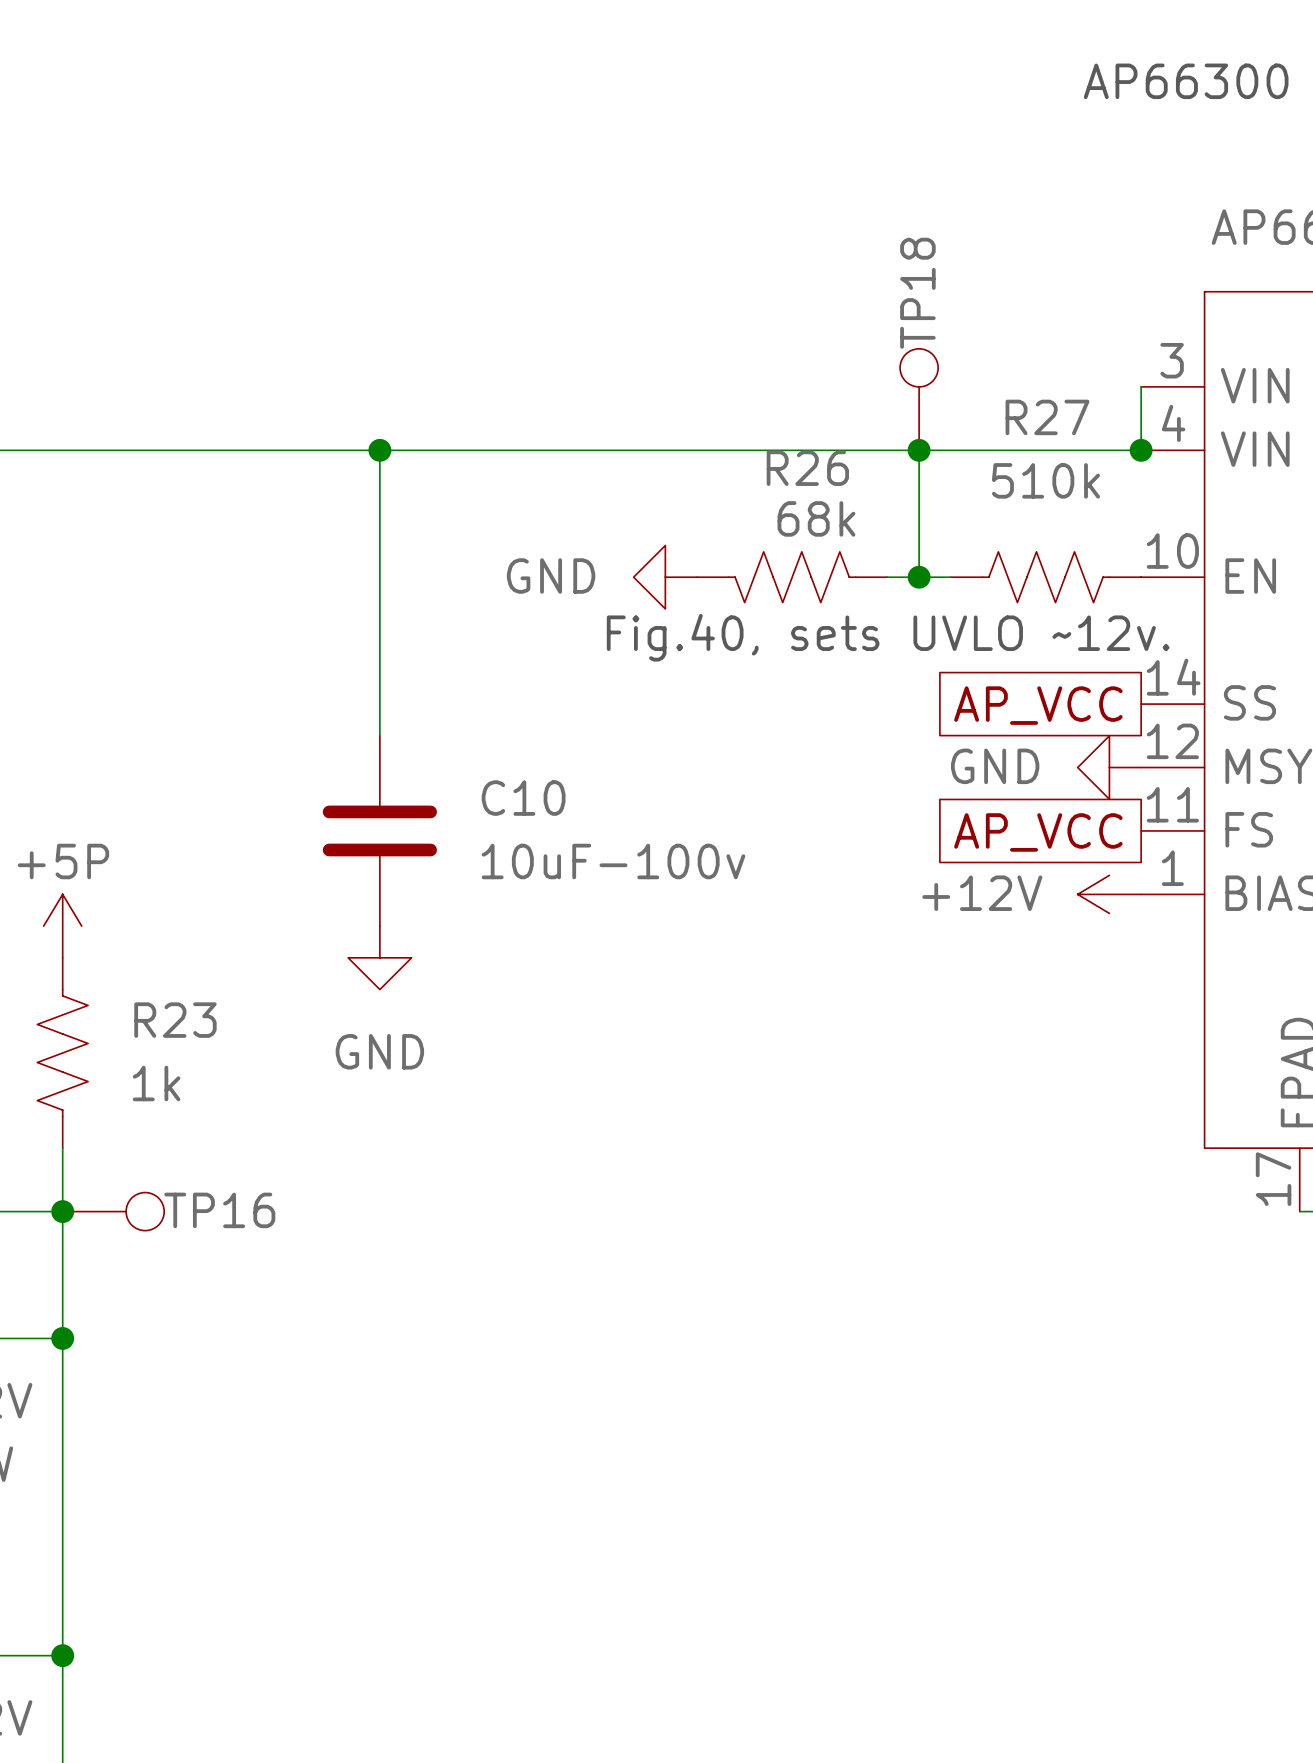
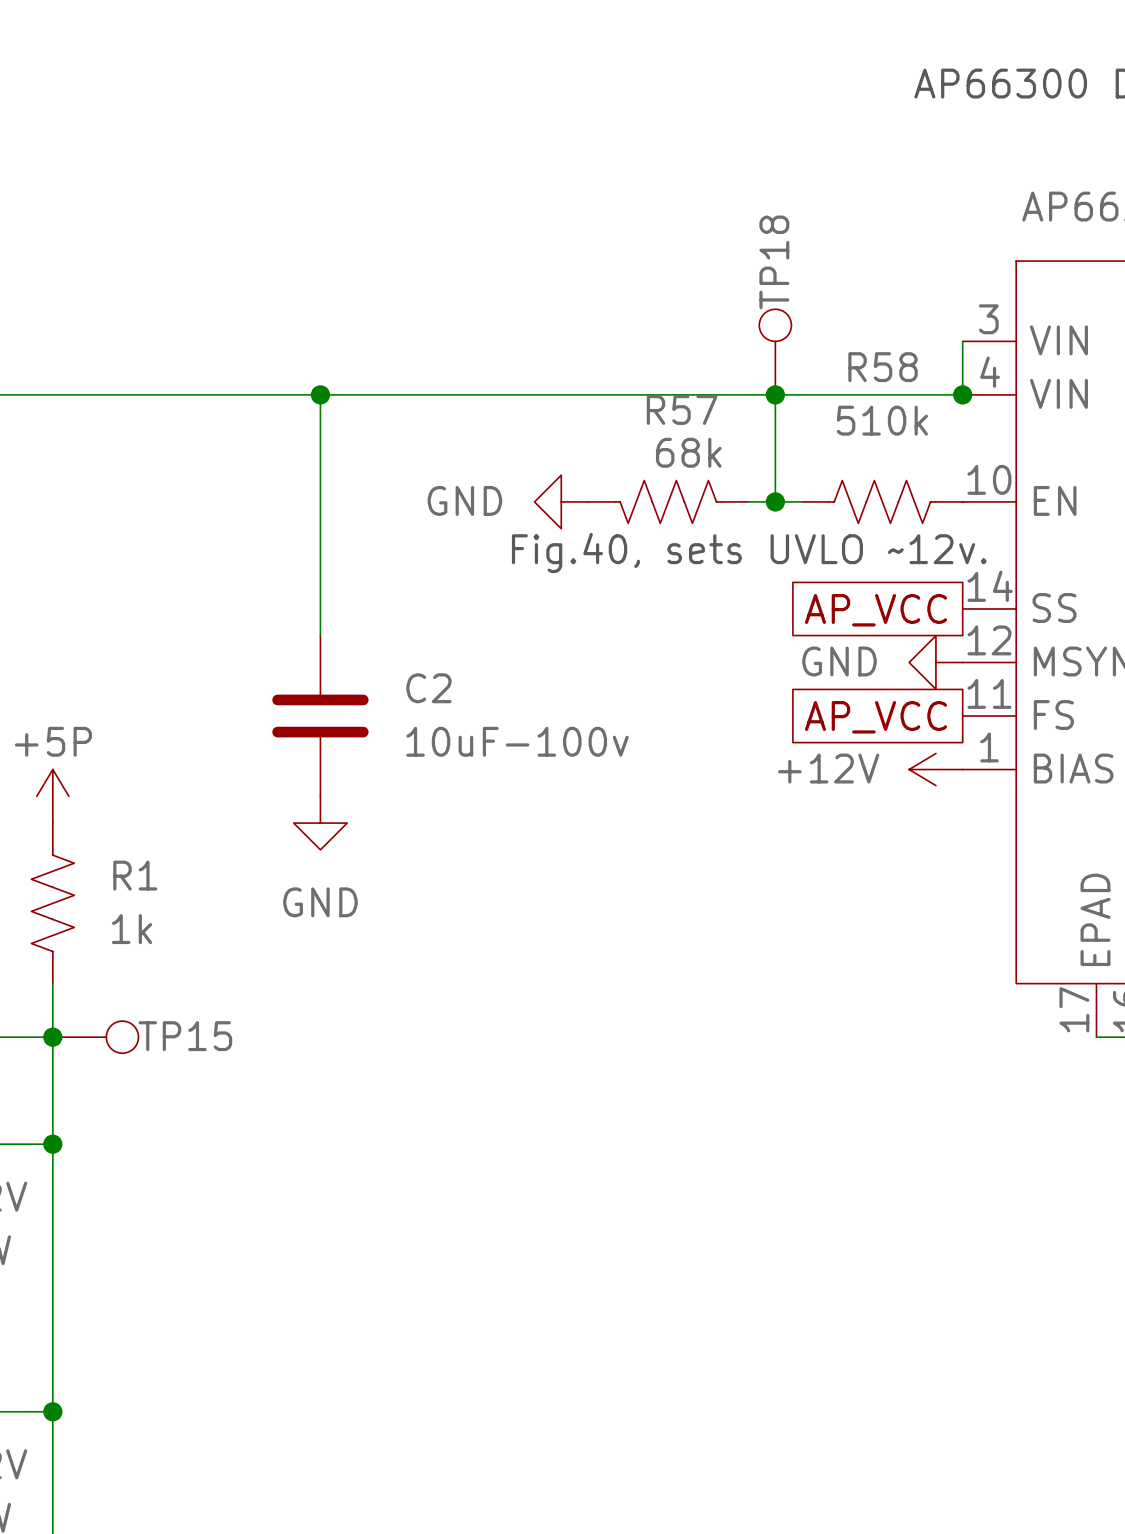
R27 name: R27 (1047, 417) -> R58 (883, 367)
R26 name: R26 (807, 468) -> R57 (682, 409)
C10 name: C10 (523, 798) -> C2 (428, 688)
R23 name: R23 (175, 1020) -> R1 (135, 875)
TP16 name: TP16 (219, 1210) -> TP15 (185, 1036)

